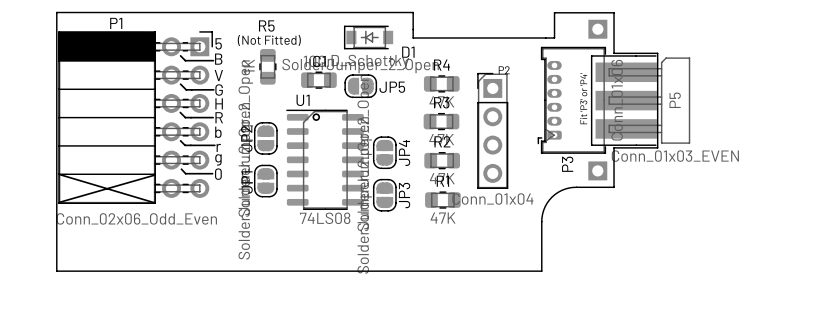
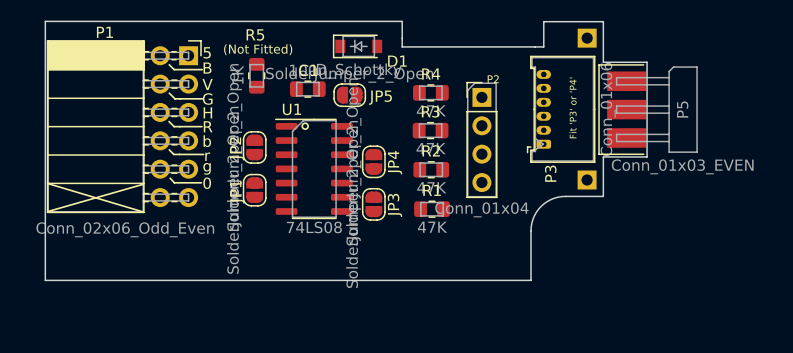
P3 footprint: [537, 46, 607, 154] -> [526, 55, 596, 163]
P5 footprint: [590, 55, 691, 146] -> [598, 64, 698, 155]

